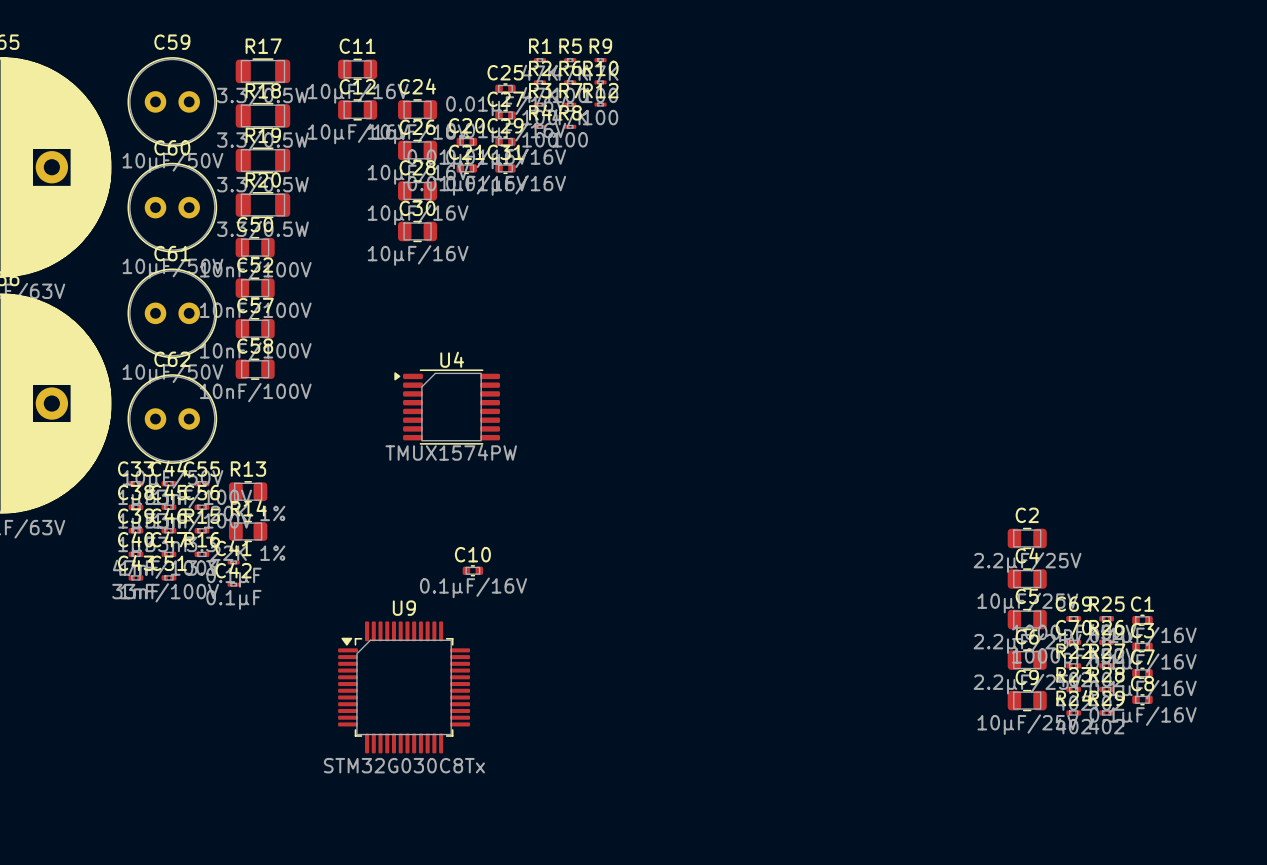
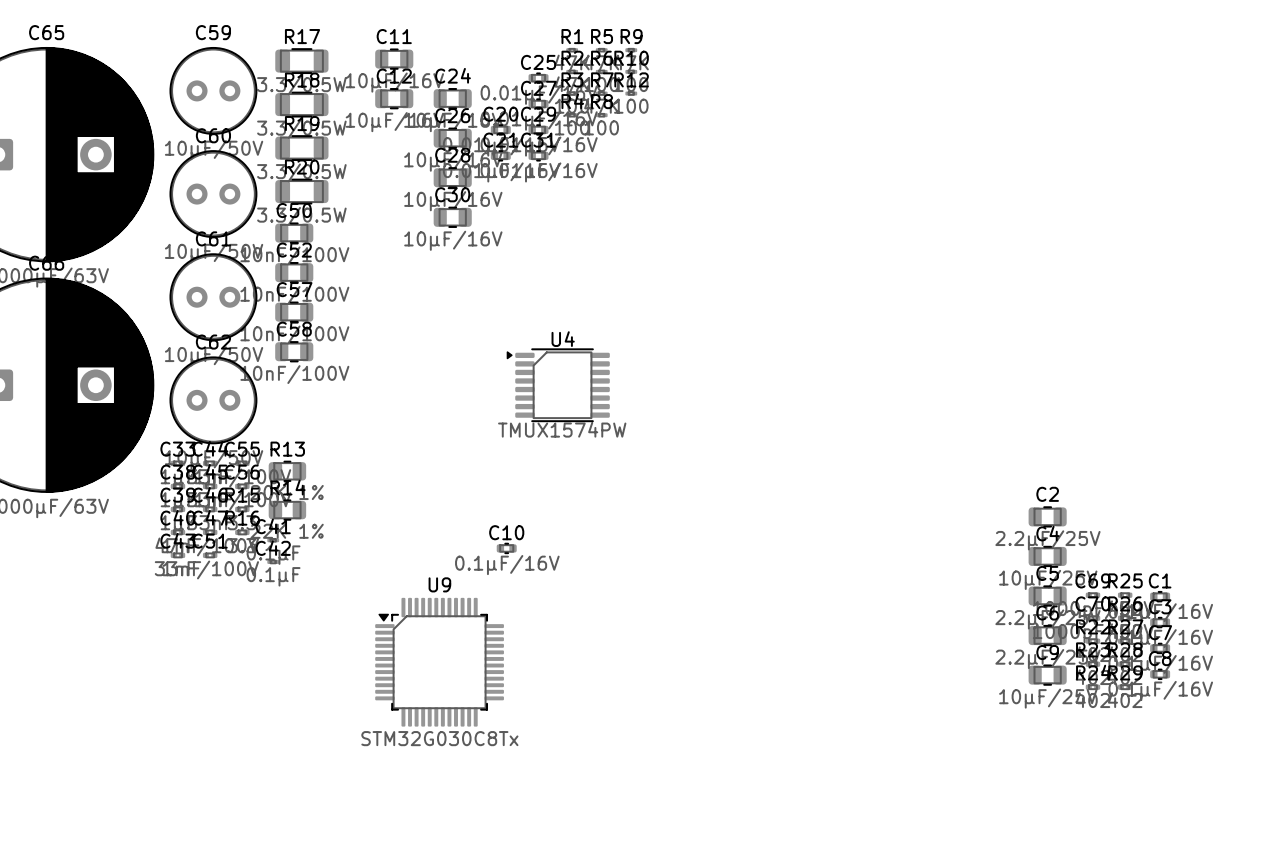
U4 position: (447, 407) -> (558, 385)

